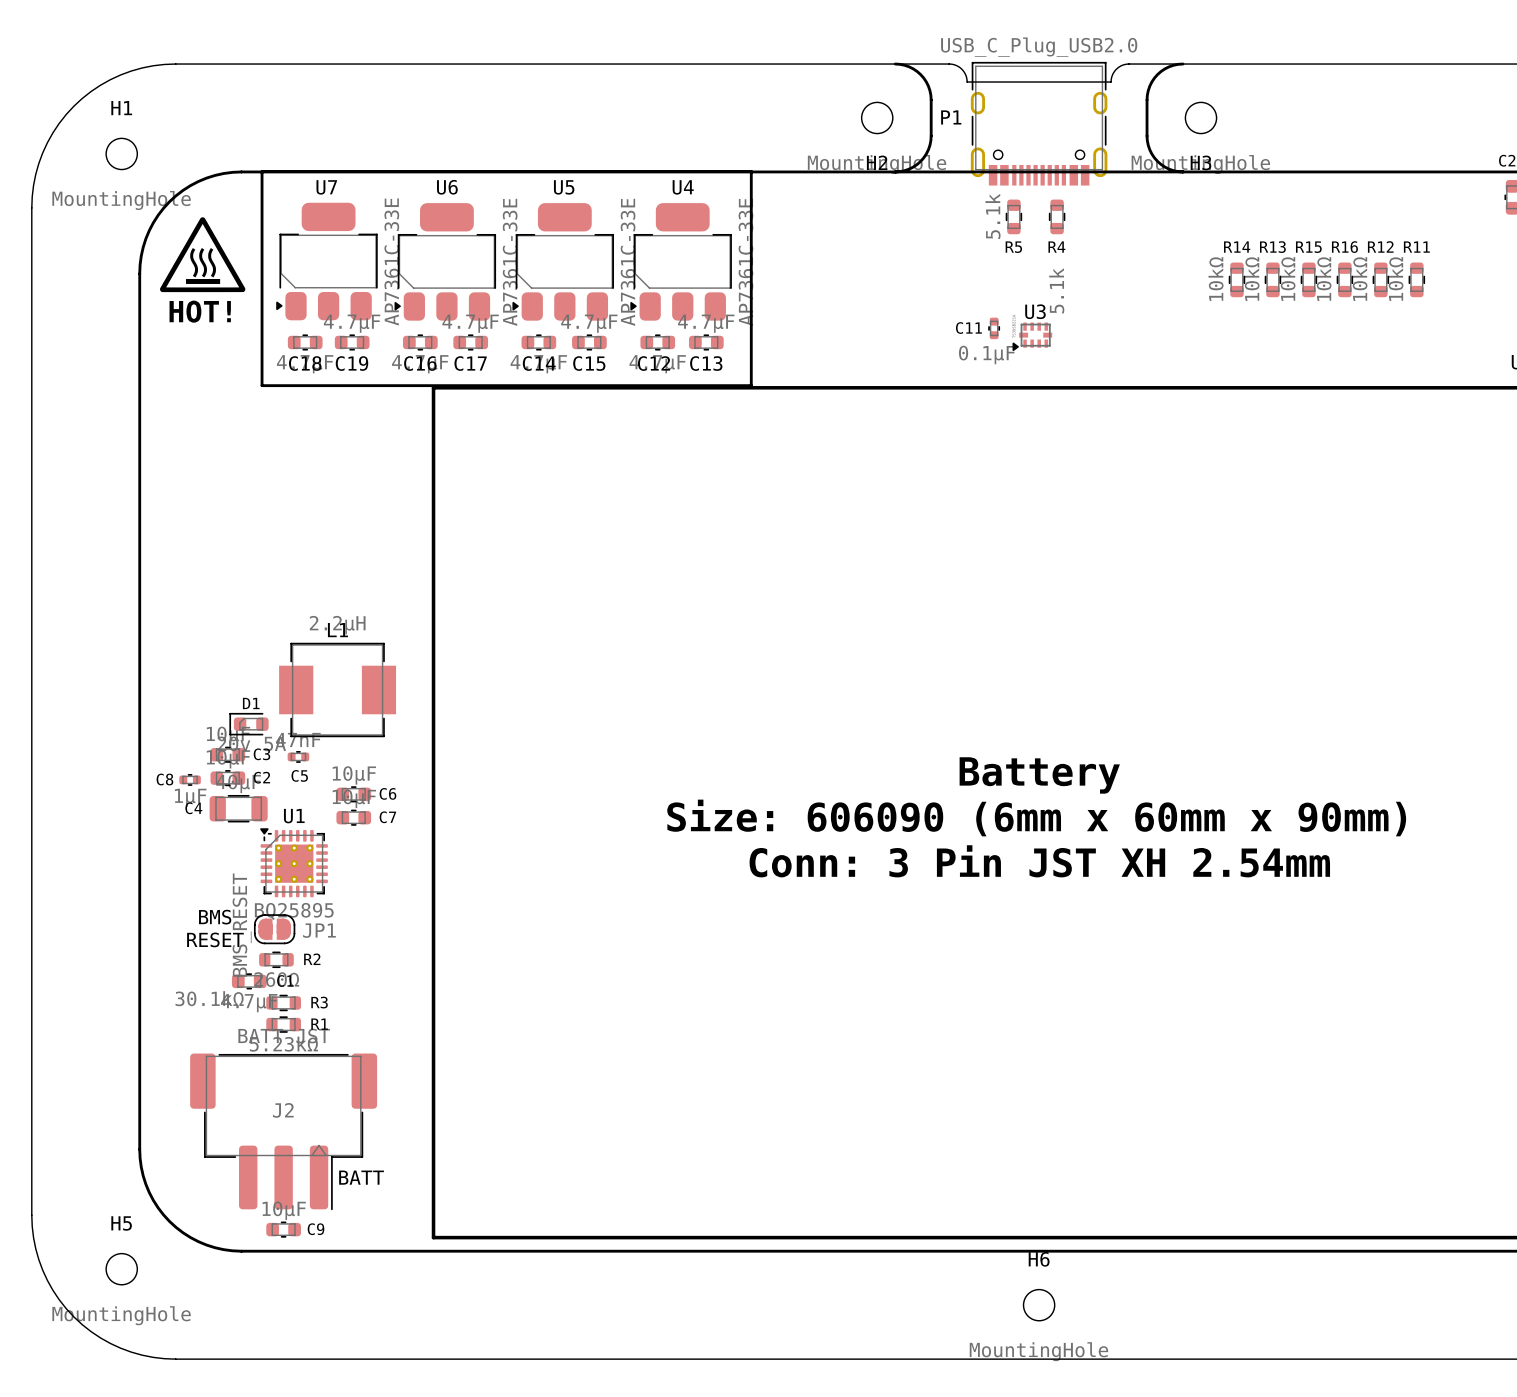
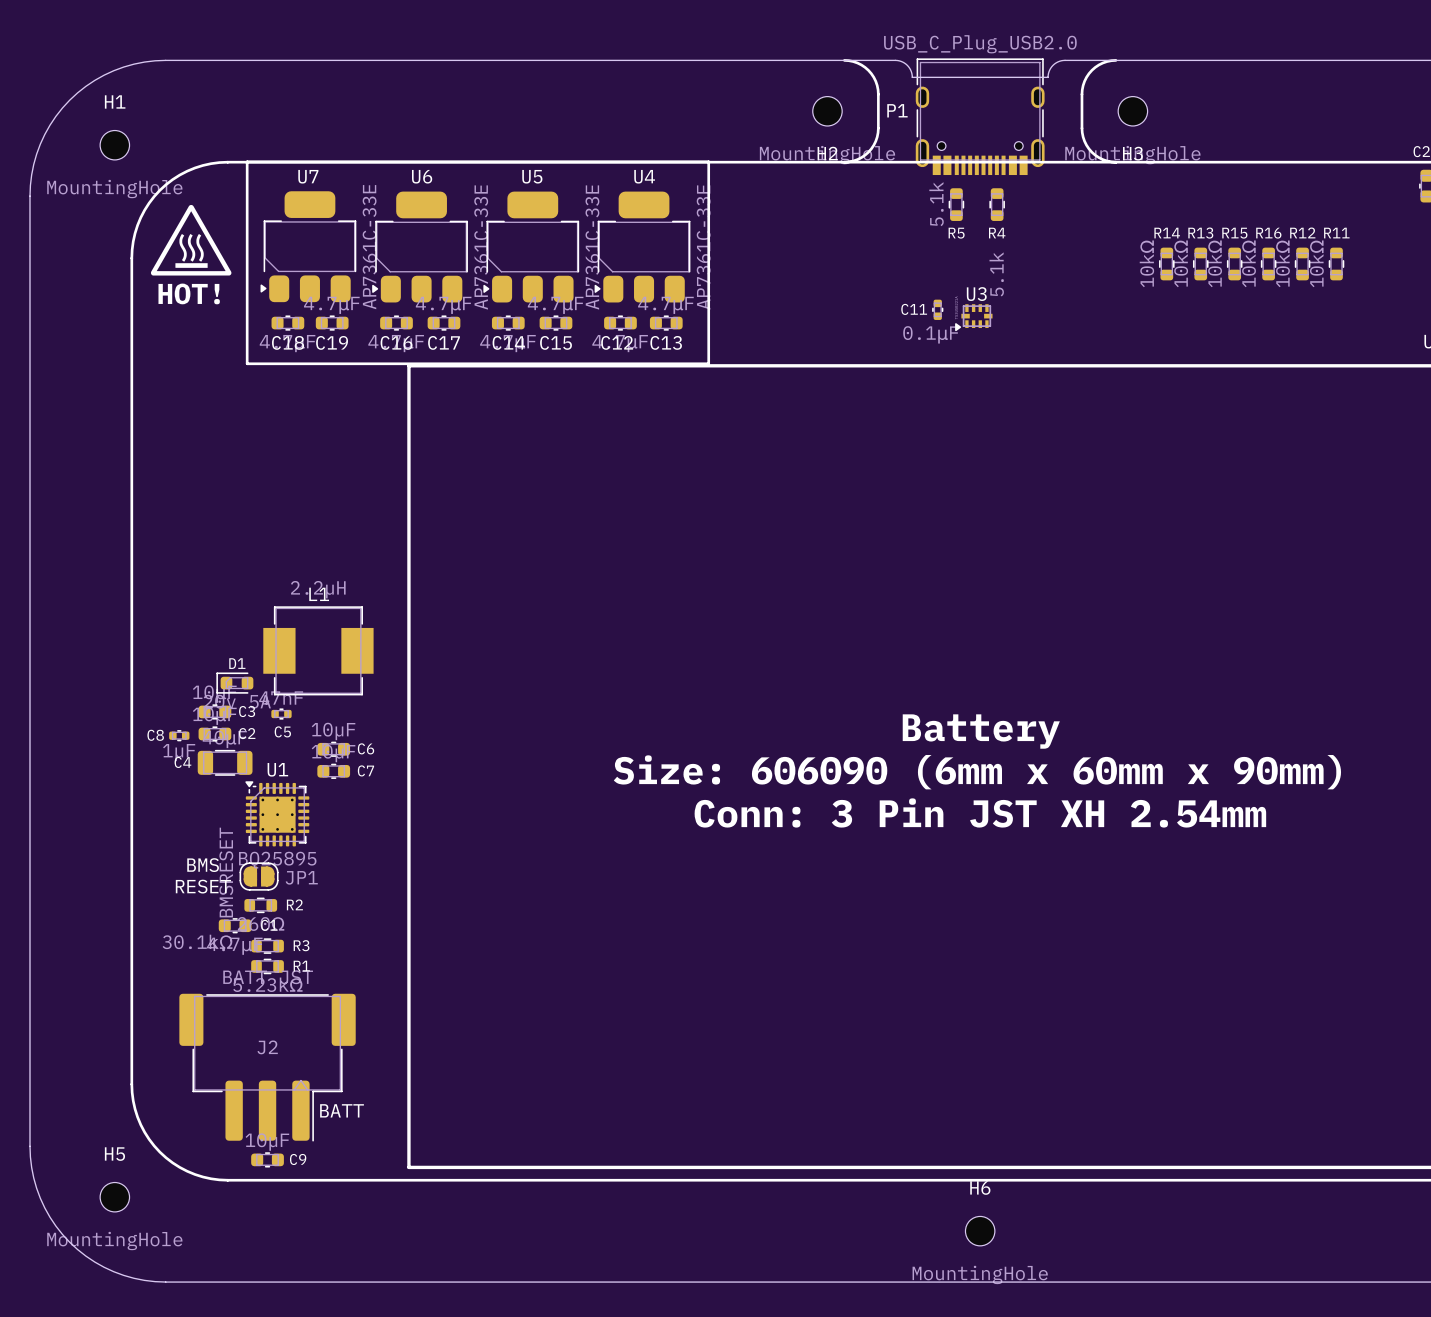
JP1 value: BMS_RESET (242, 925) -> BMSRESET (226, 872)

